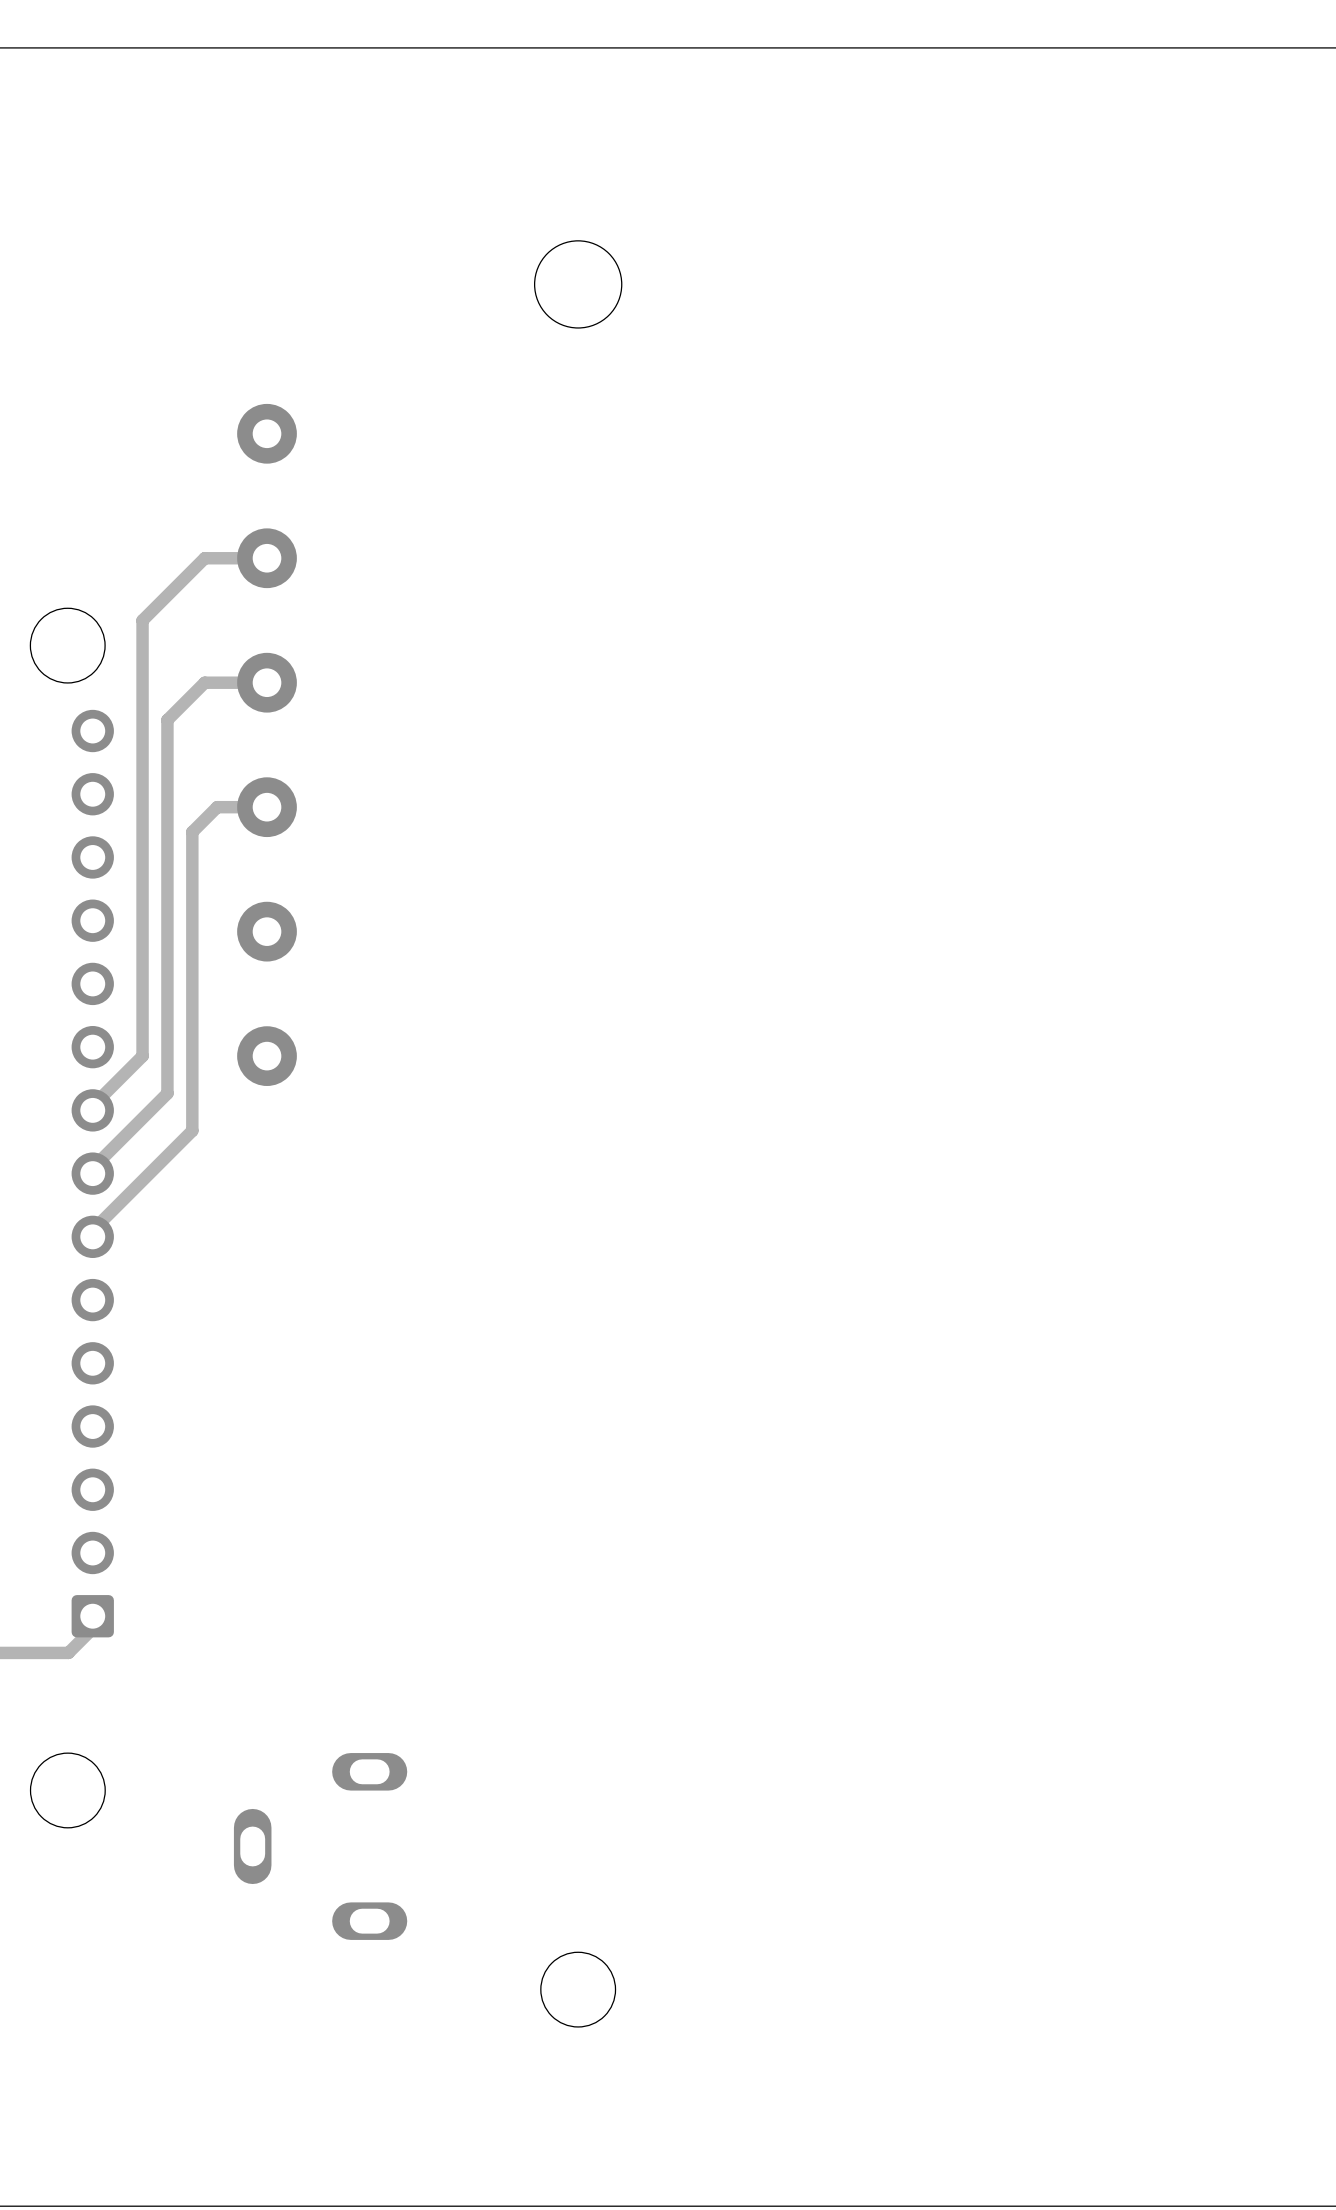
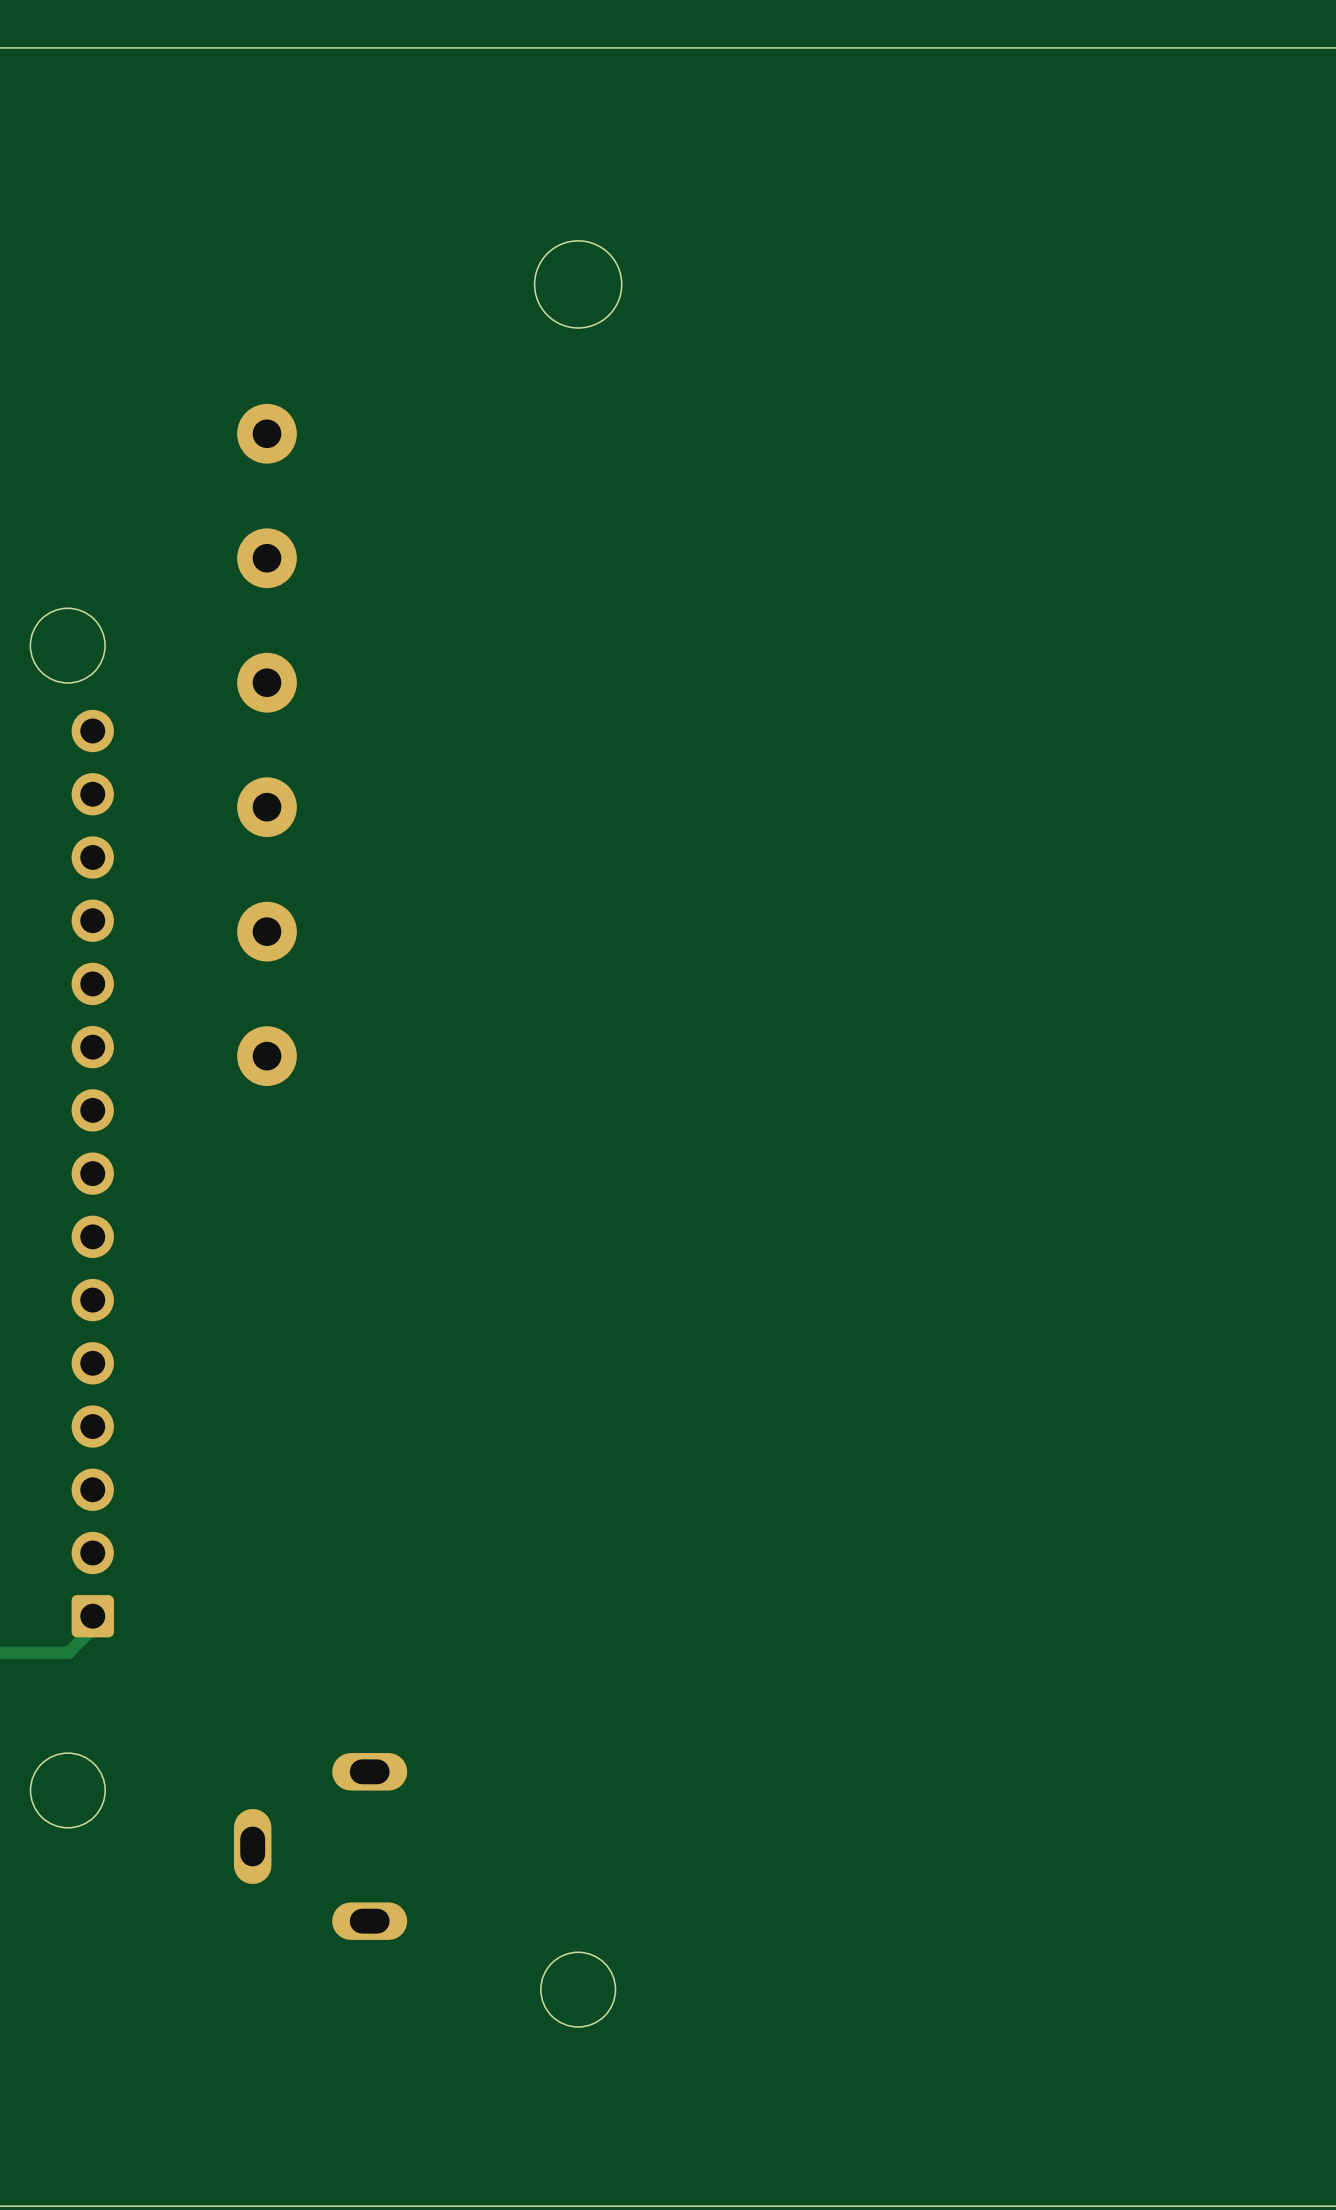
track: (267, 558) (204, 558) (142, 620) (142, 1056) (92, 1105) -> none
track: (267, 682) (204, 682) (167, 720) (167, 1093) (92, 1168) -> none
track: (267, 807) (217, 807) (192, 832) (192, 1130) (92, 1230) -> none

